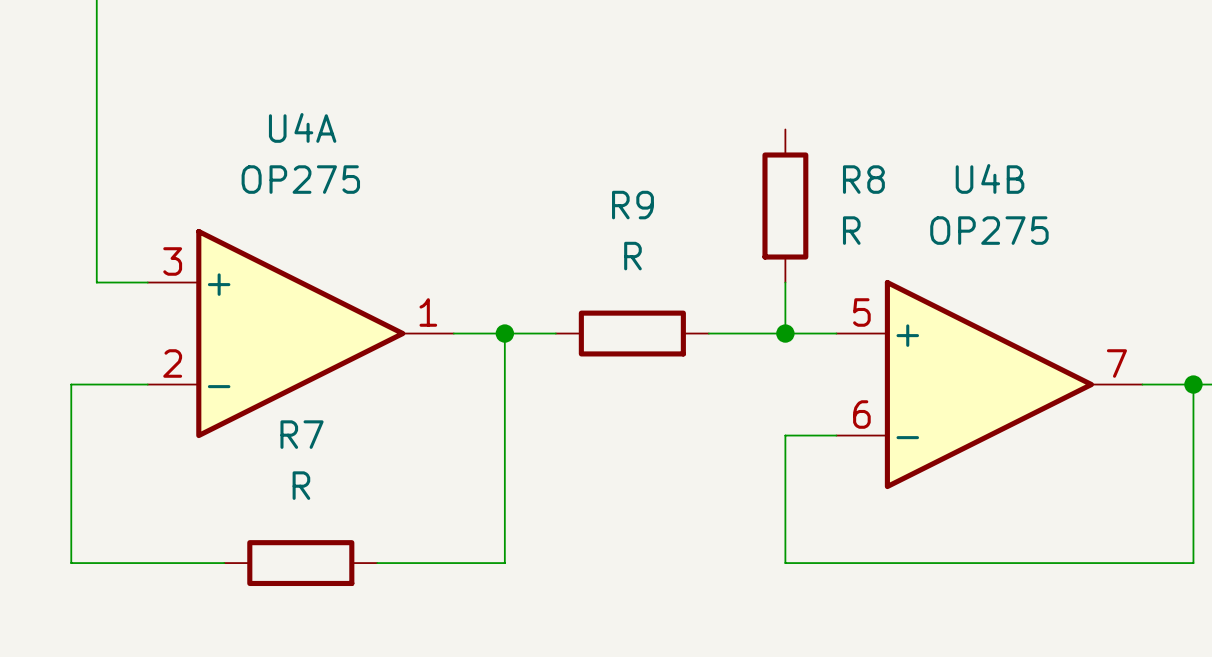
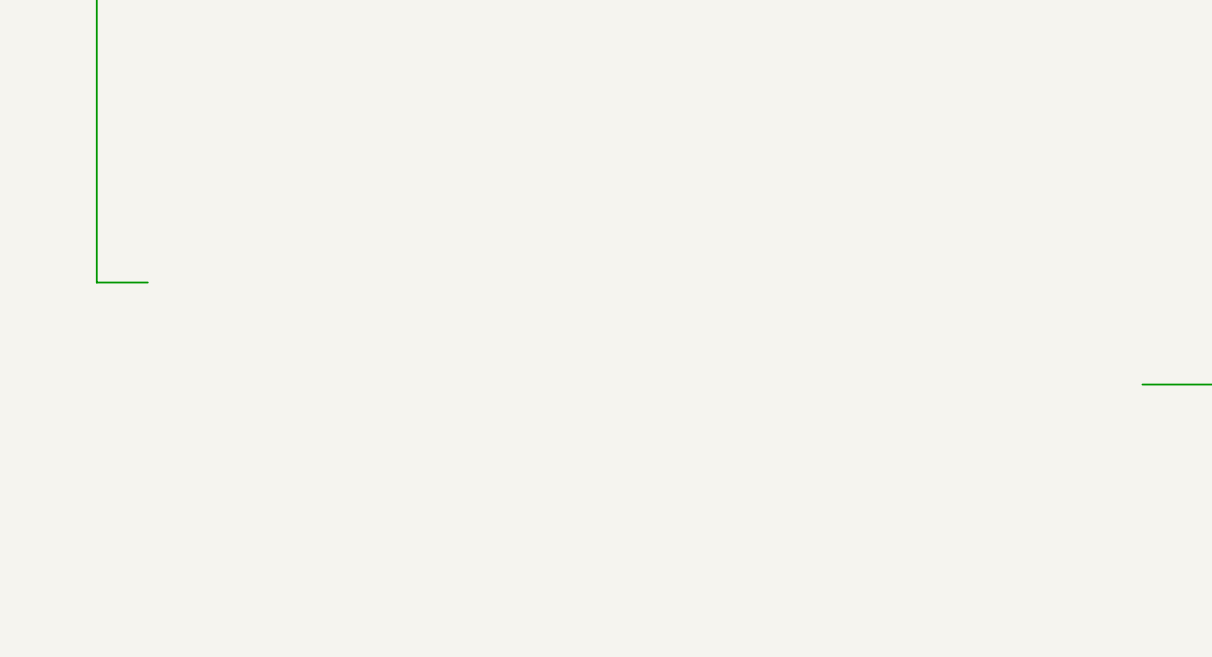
R8: R (785, 206) -> none
wire: (785, 282) (785, 333) -> none
U4A: OP275 (300, 333) -> none
wire: (453, 333) (555, 333) -> none
wire: (504, 333) (504, 563) (377, 563) -> none
junction: (504, 333) -> none
R9: R (632, 333) -> none
wire: (708, 333) (836, 333) -> none
junction: (785, 333) -> none
wire: (147, 384) (71, 384) (71, 563) (224, 563) -> none
U4B: OP275 (989, 384) -> none
wire: (1193, 384) (1193, 563) (785, 563) (785, 435) (836, 435) -> none
junction: (1193, 384) -> none
R7: R (300, 563) -> none

